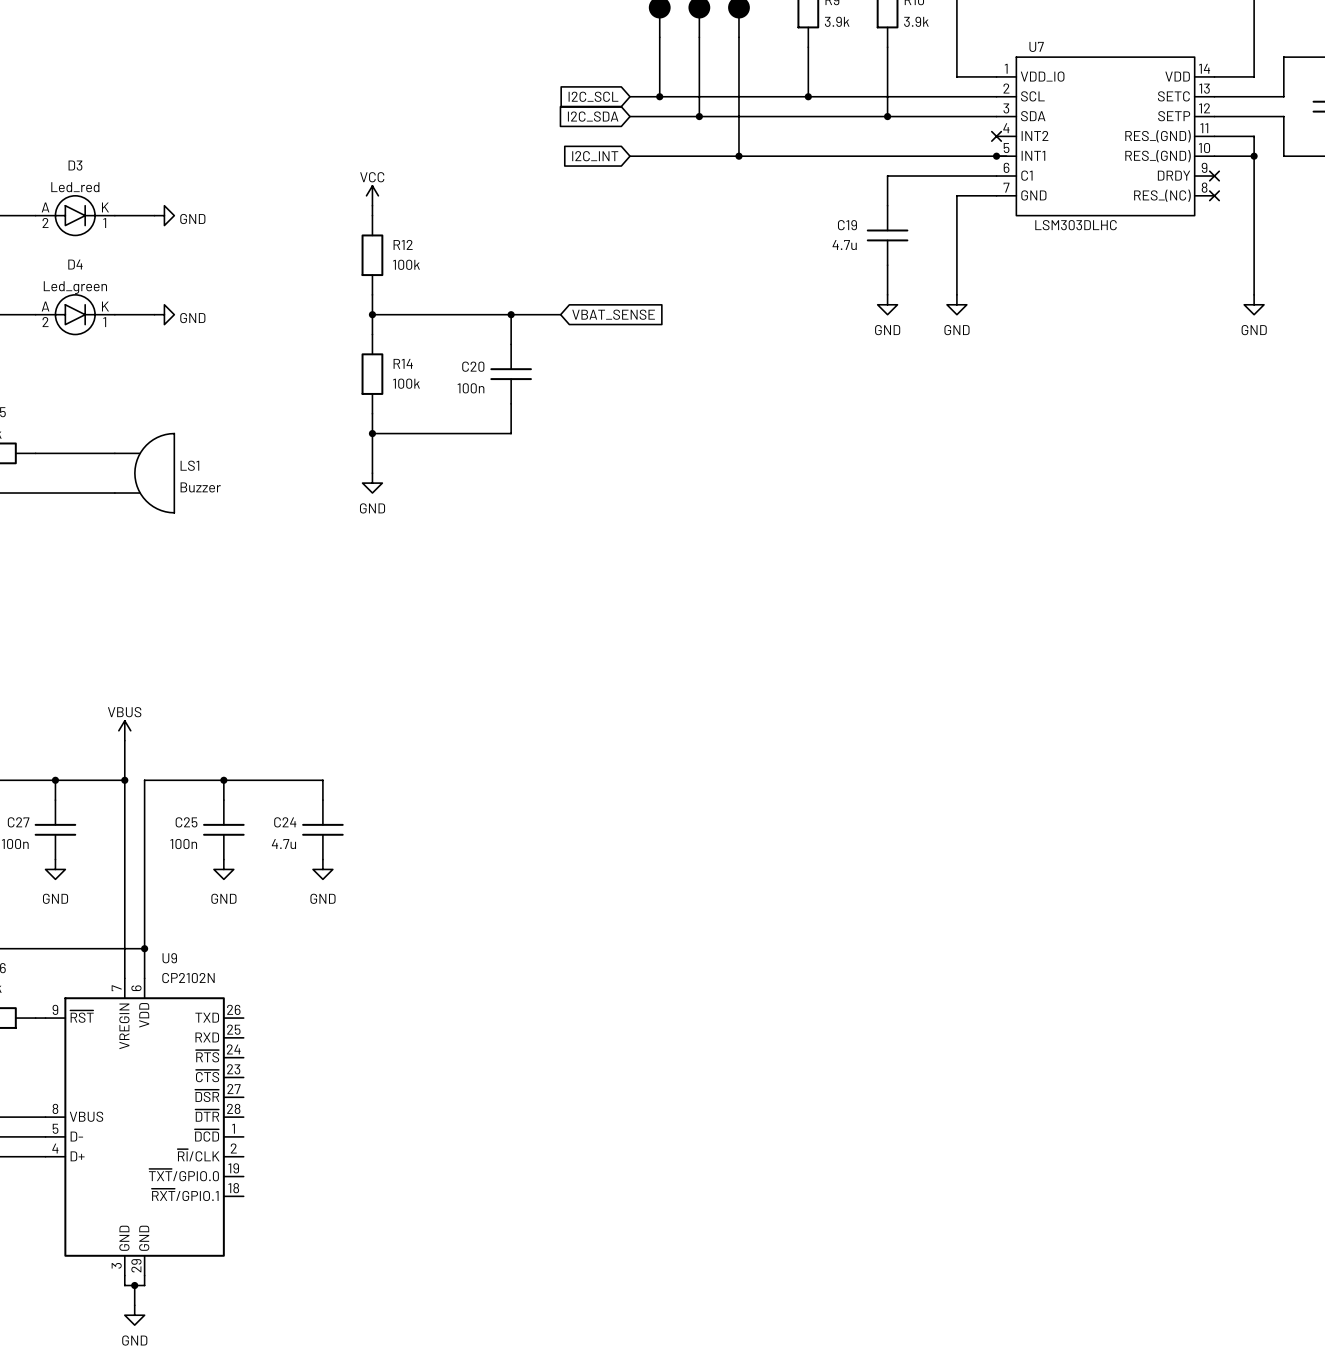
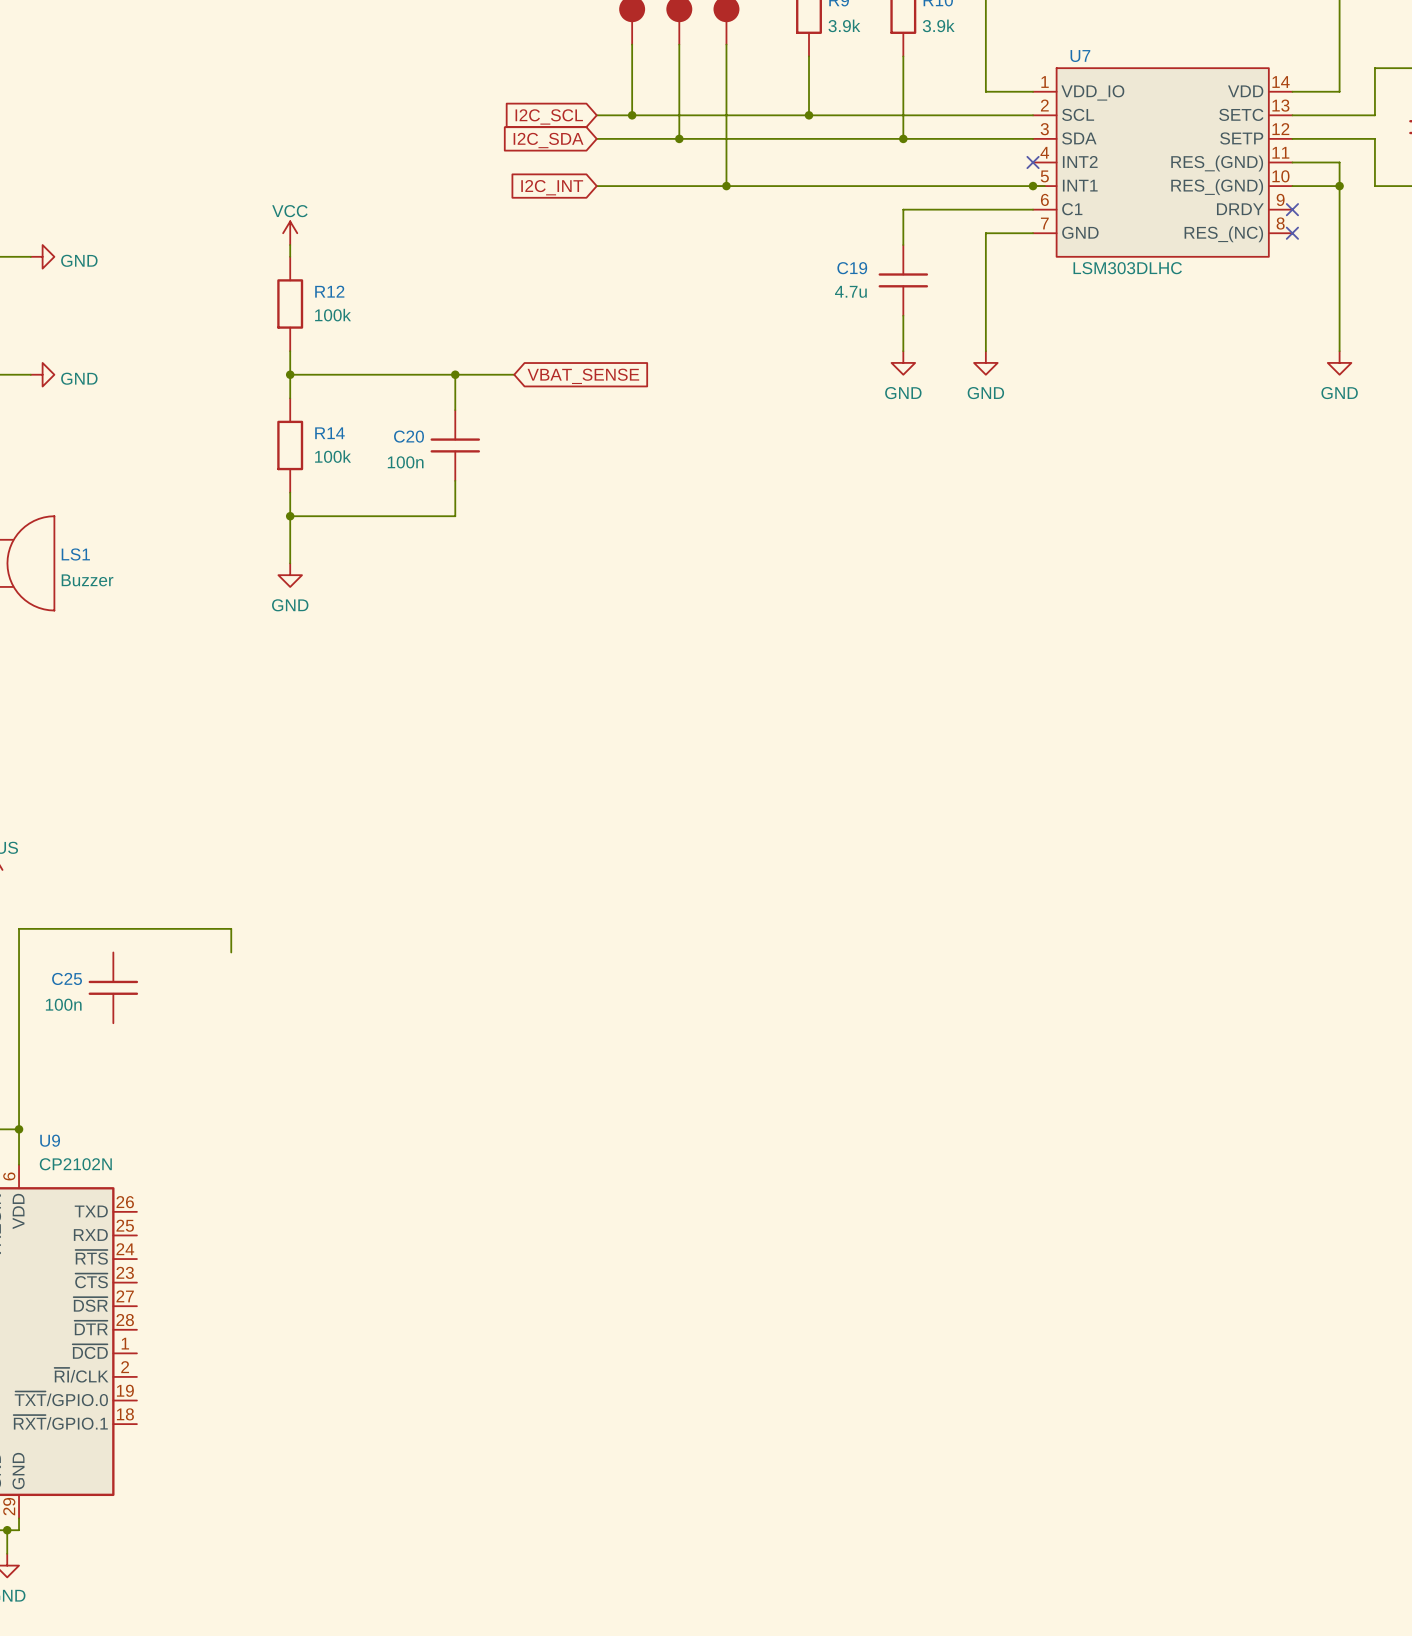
wire: (223, 780) (223, 800) -> none
junction: (223, 780) -> none
C24: 4.7u (322, 829) -> none
power symbol: GND (223, 869) -> none
power symbol: GND (322, 869) -> none

